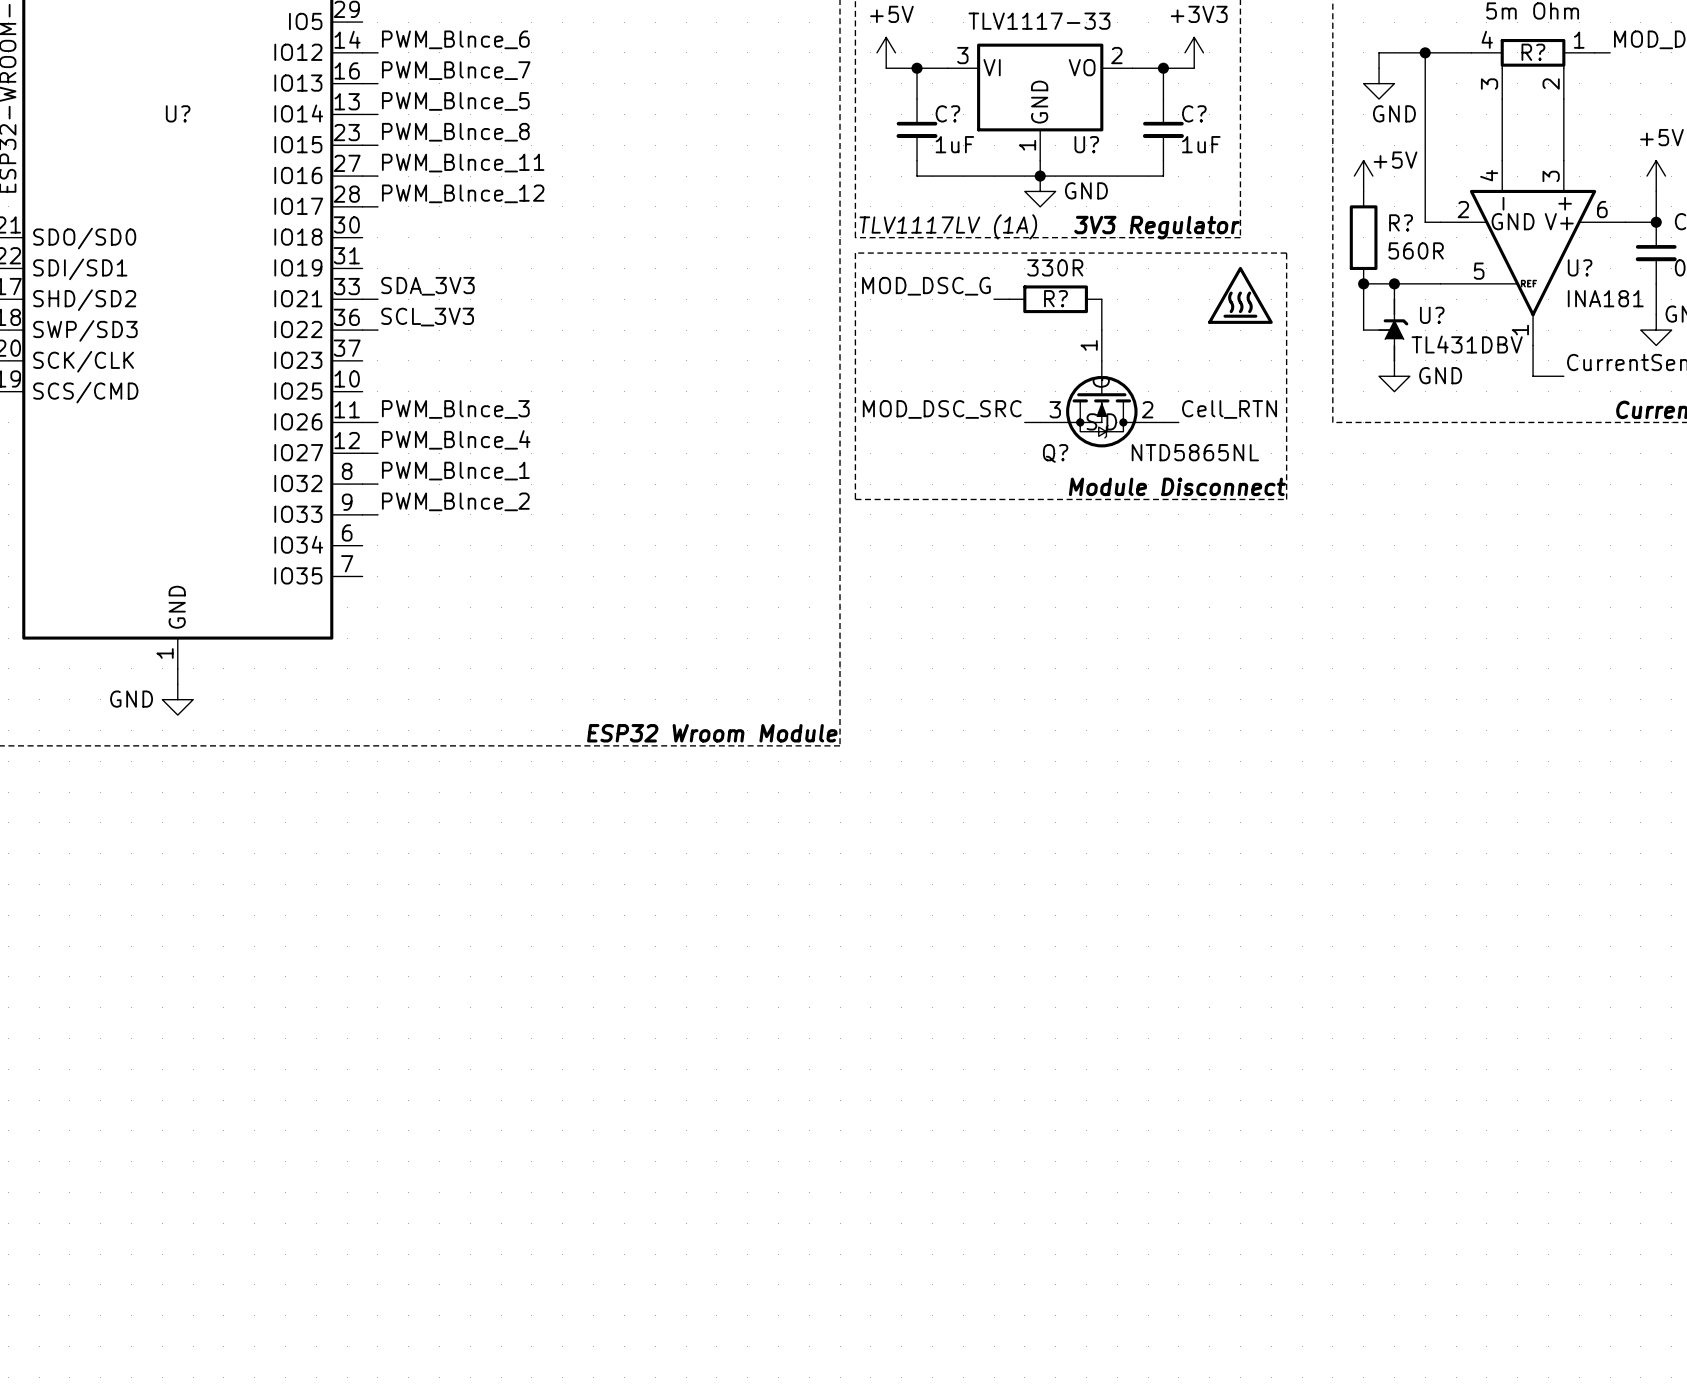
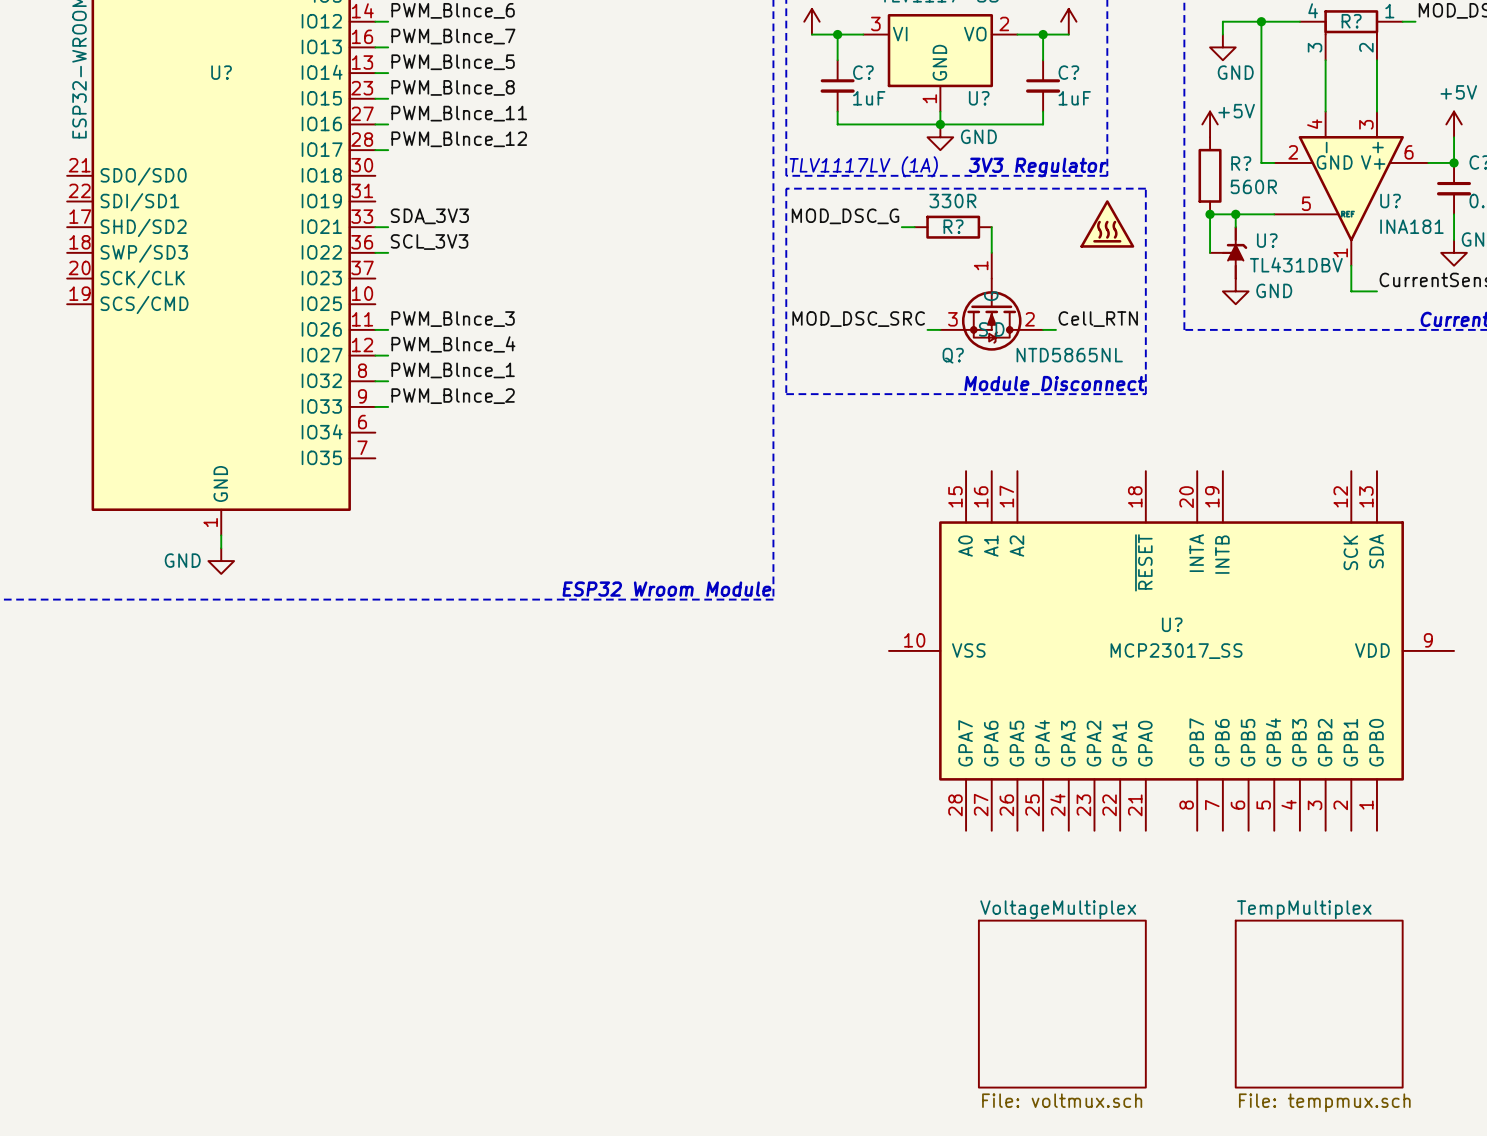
U?: none -> MCP23017_SS (1171, 650)
sheet VoltageMultiplex: none -> File: voltmux.sch (1062, 1004)
sheet TempMultiplex: none -> File: tempmux.sch (1319, 1004)

